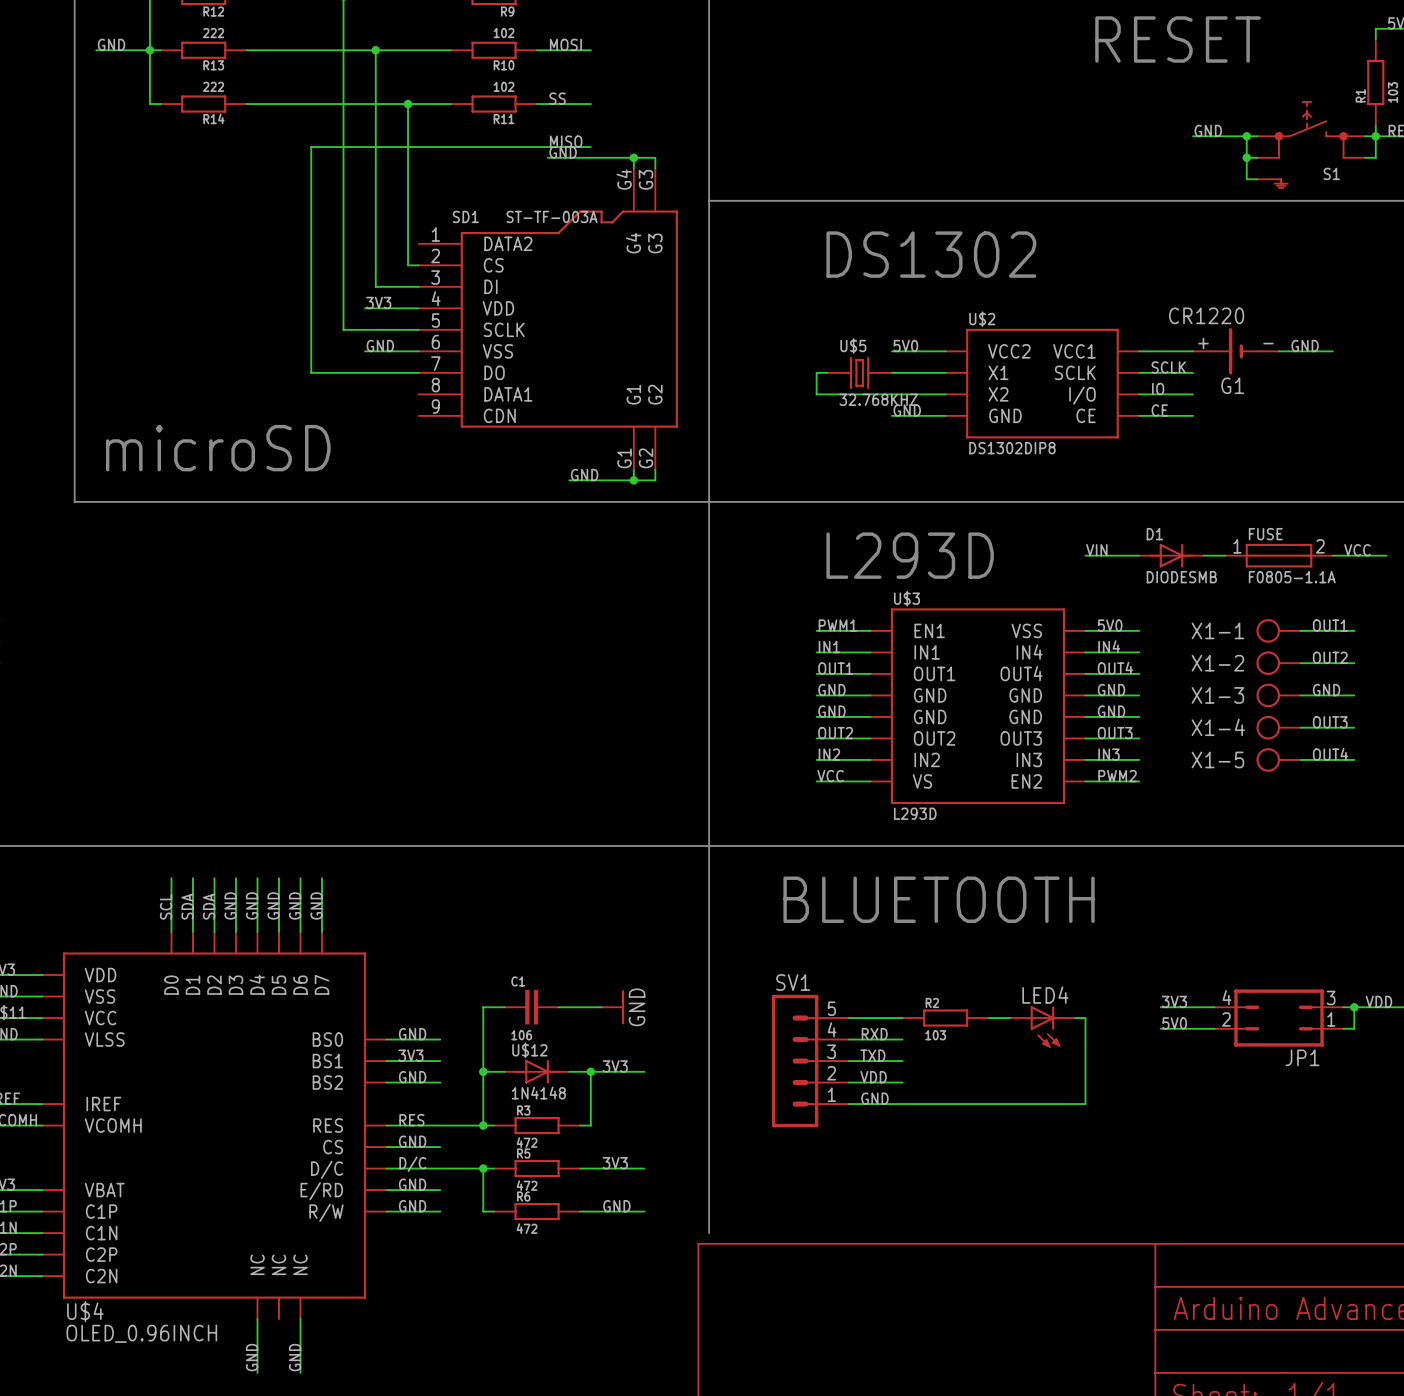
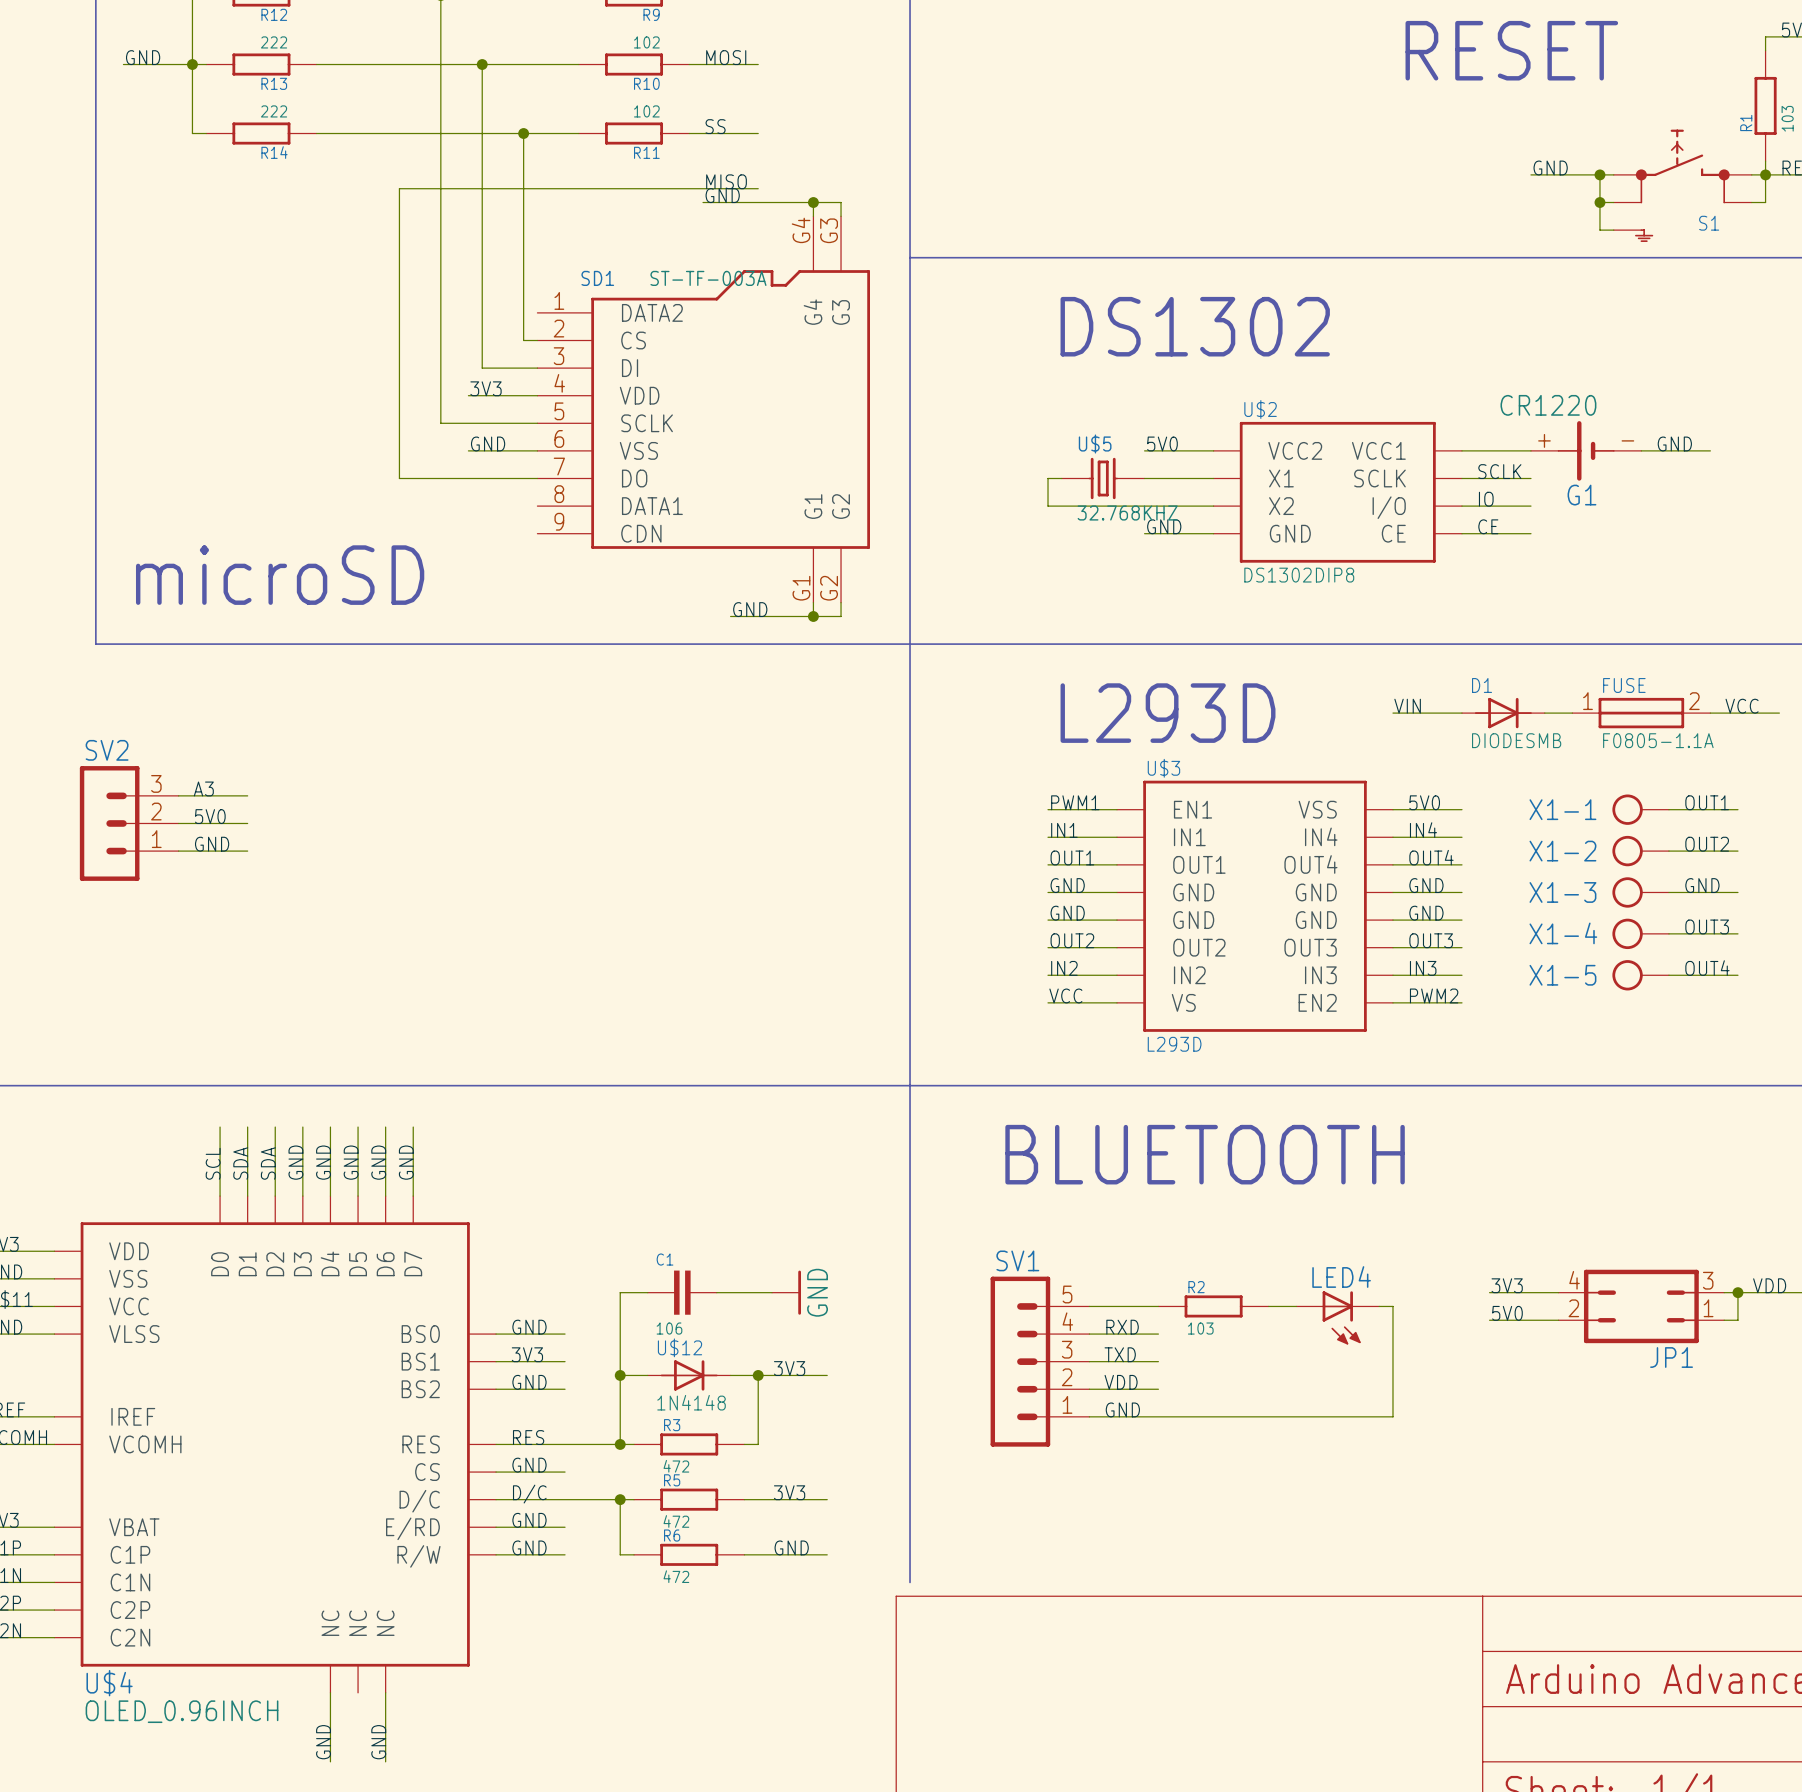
label: none -> A3 (203, 788)
wire: none -> (178, 795) (247, 795)
label: none -> 5V0 (210, 816)
SV2: none -> (129, 823)
wire: none -> (178, 823) (247, 823)
label: none -> GND (212, 844)
wire: none -> (178, 851) (247, 851)

